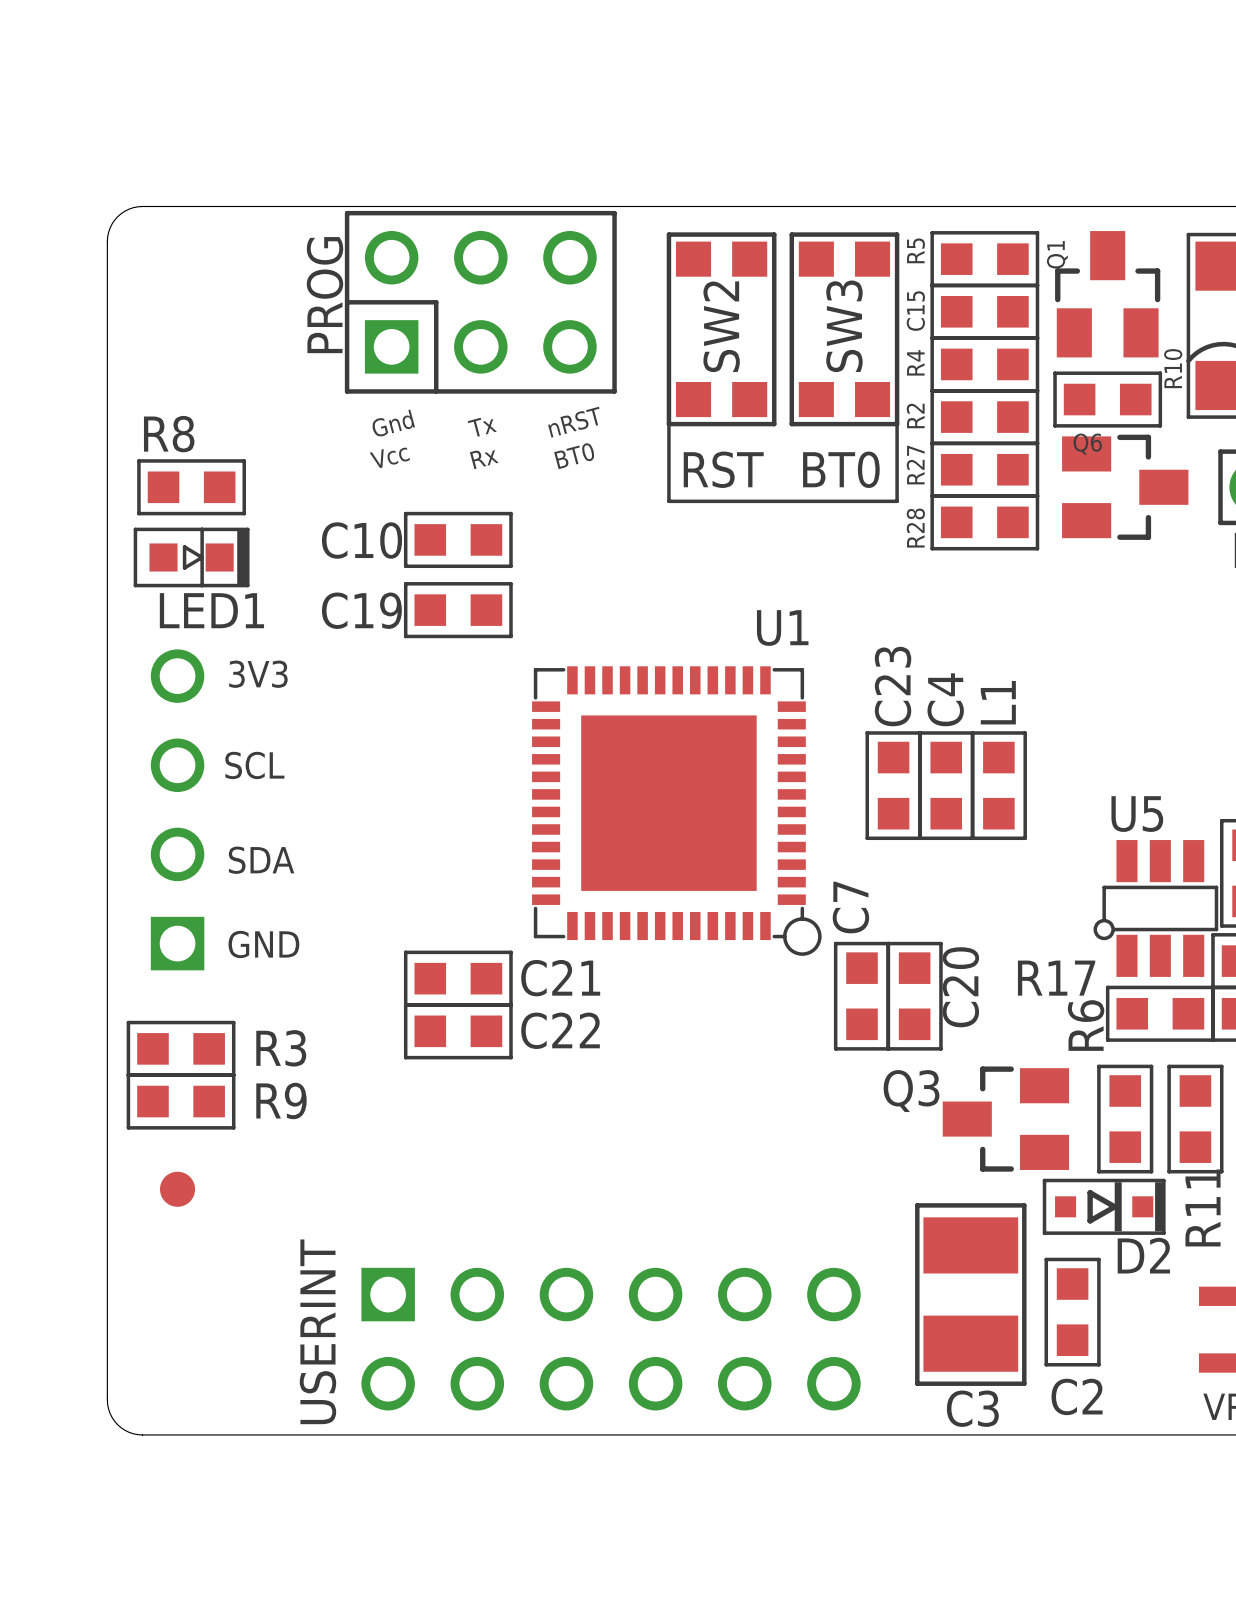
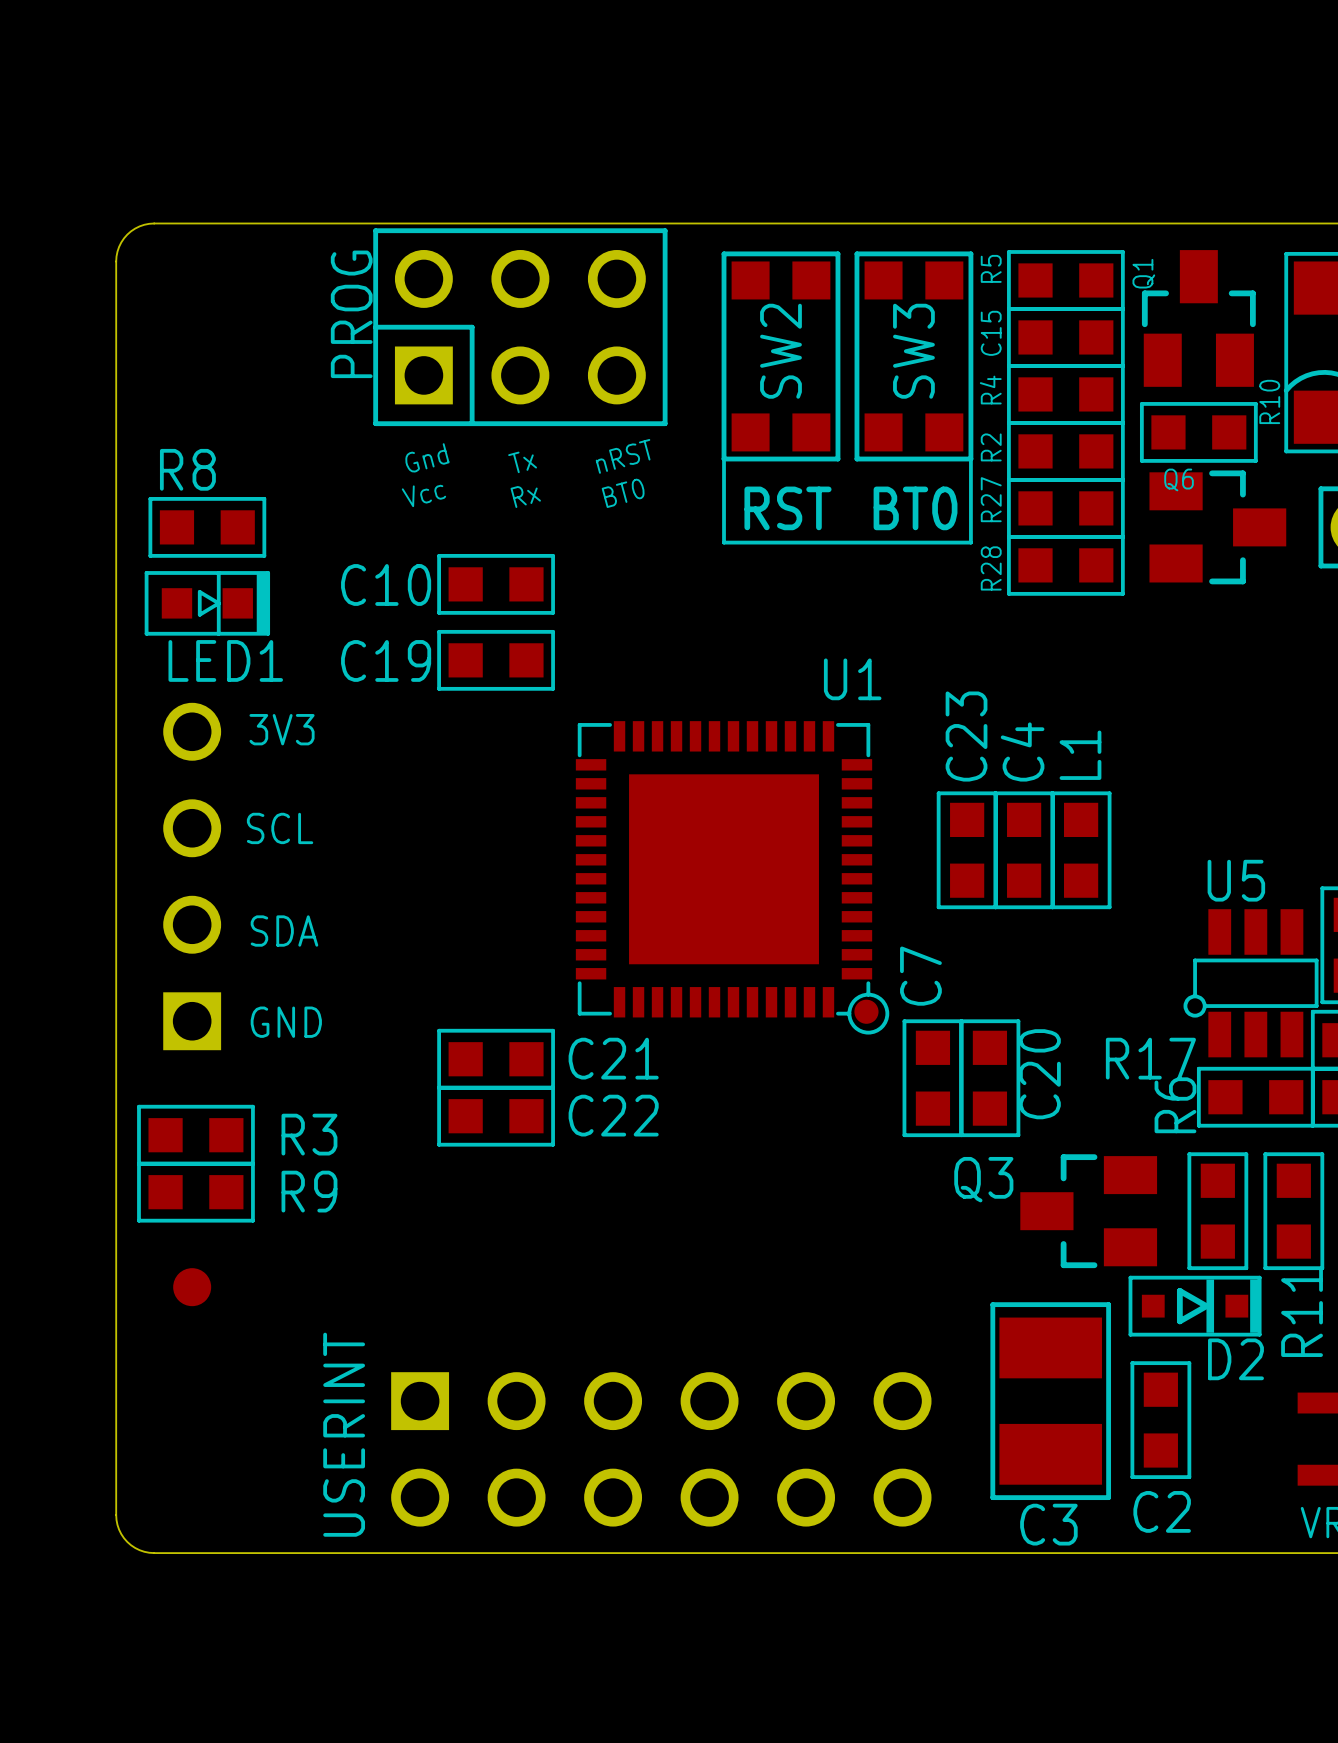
part: none -> (866, 1011)

